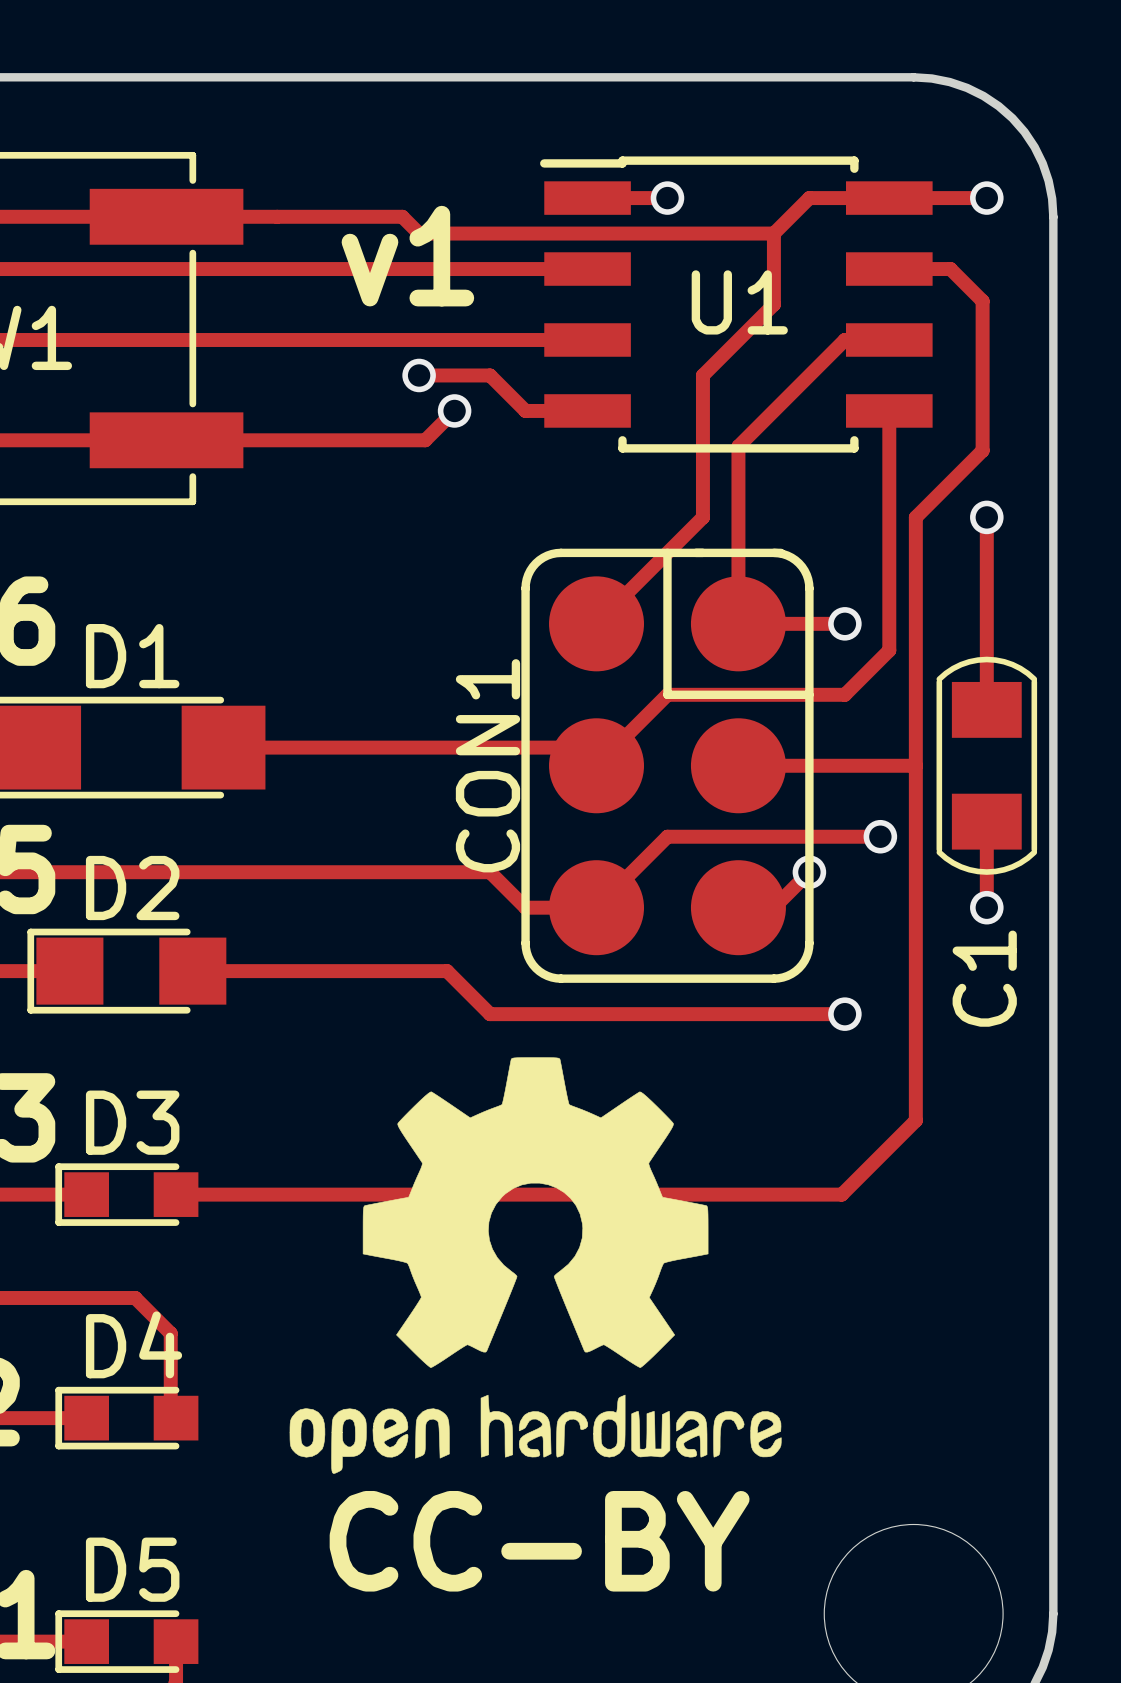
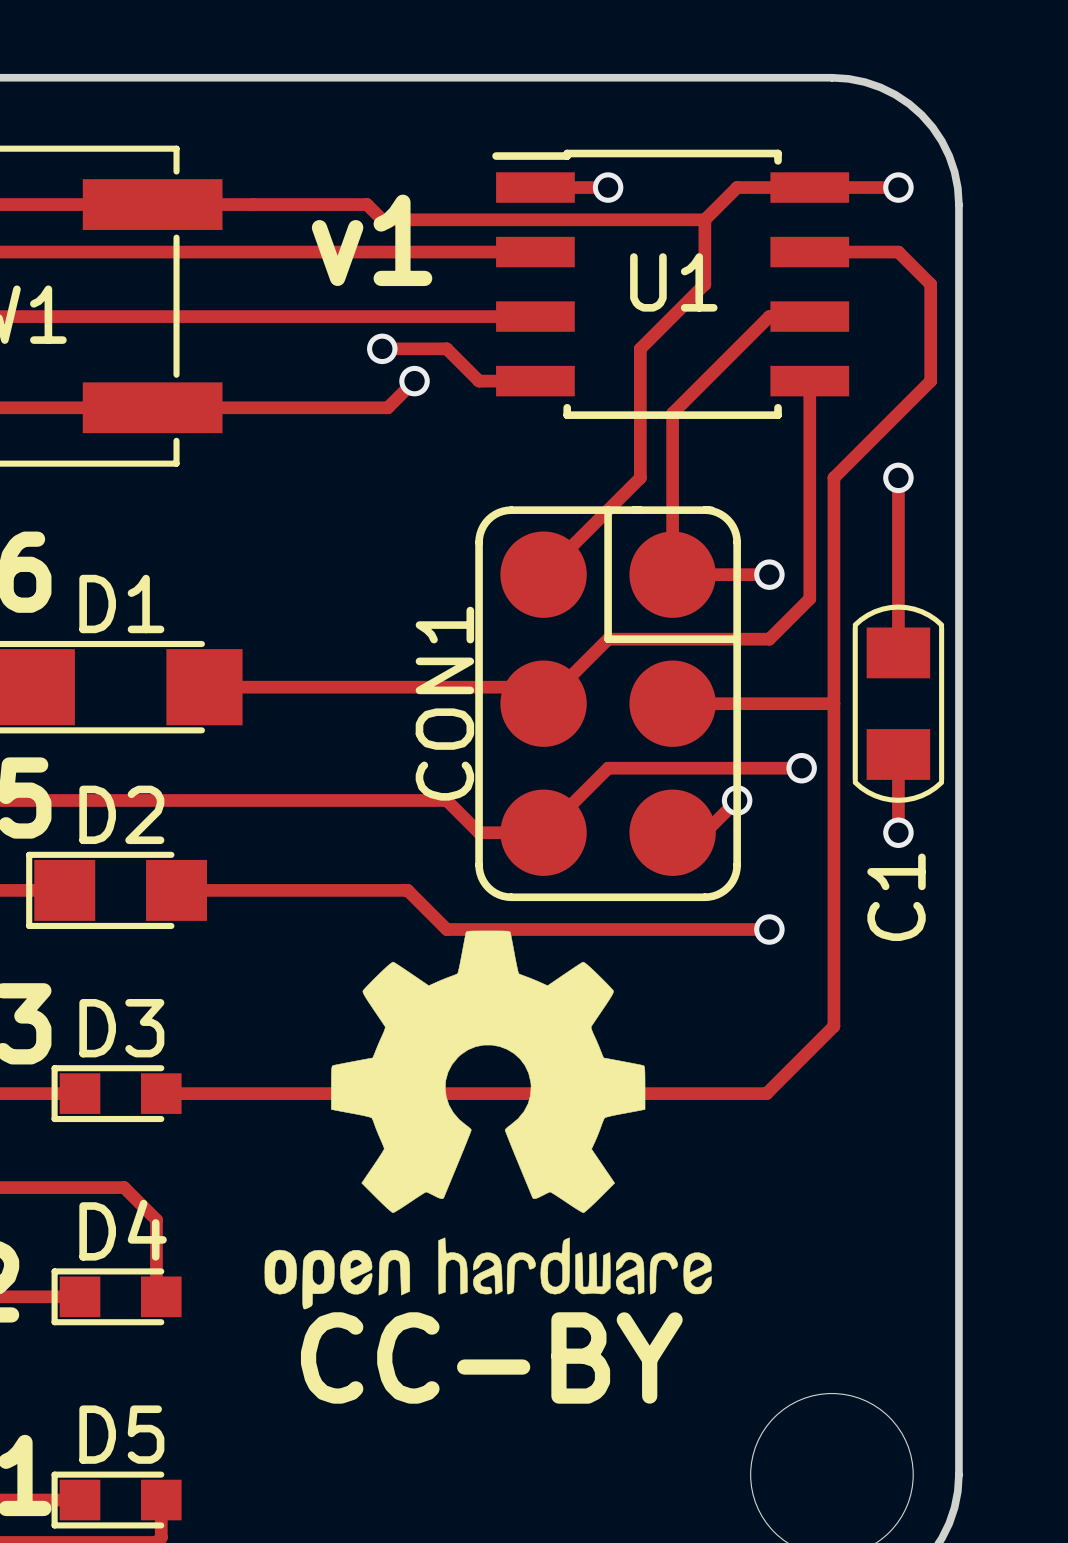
track: (950, 269) (982, 301) (982, 450) -> (865, 252) (898, 252) (930, 284) (930, 381) (894, 417)
drawing position: (535, 1265) -> (488, 1119)
text position: CC-BY (539, 1541) -> CC-BY (491, 1357)

